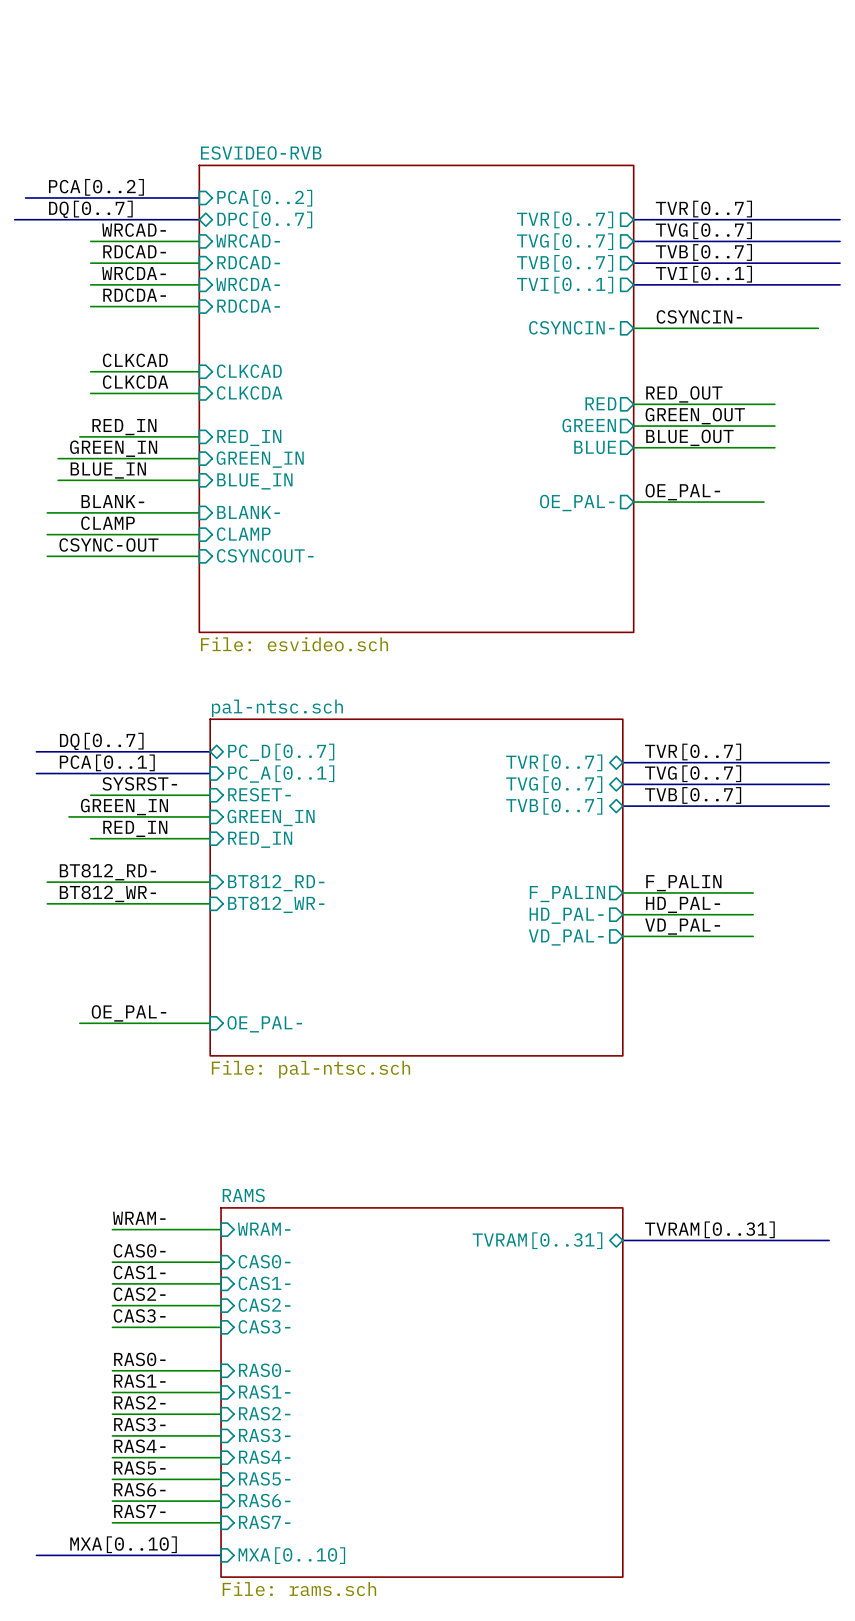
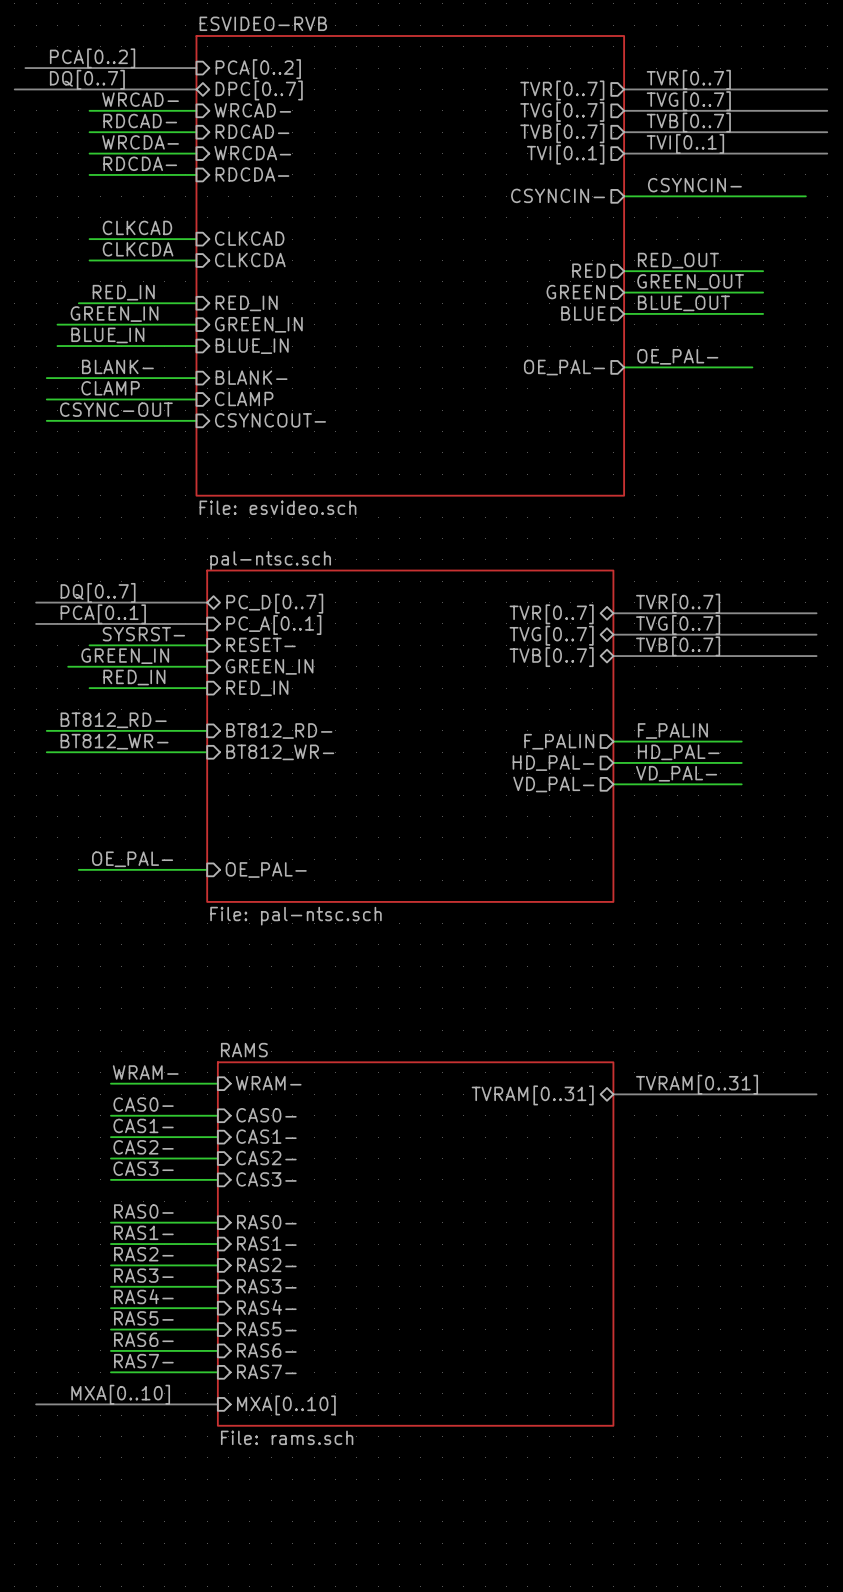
label: none -> WRCAD- (140, 99)
sheet pin: none -> WRCAD- (252, 110)
wire: none -> (89, 110) (196, 110)
label: none -> RDCAD- (140, 121)
wire: none -> (89, 132) (196, 132)
sheet pin: none -> RDCAD- (252, 131)
sheet pin: none -> RDCDA- (252, 174)
label position: PCA[0..2] (96, 187) -> PCA[0..2] (92, 58)
bus: (25, 197) (199, 197) -> (25, 68) (196, 68)
sheet pin position: PCA[0..2] (264, 198) -> PCA[0..2] (258, 69)
label position: DQ[0..7] (90, 209) -> DQ[0..7] (87, 79)
label position: TVR[0..7] (703, 209) -> TVR[0..7] (688, 79)
bus: (14, 219) (199, 219) -> (14, 89) (196, 89)
sheet pin position: DPC[0..7] (264, 219) -> DPC[0..7] (259, 90)
sheet pin position: TVR[0..7] (565, 219) -> TVR[0..7] (562, 90)
bus: (633, 219) (840, 219) -> (624, 89) (827, 89)
label: WRCAD- (134, 230) -> CLKCAD (137, 227)
label position: TVG[0..7] (703, 230) -> TVG[0..7] (688, 101)
sheet pin: WRCAD- (248, 240) -> CLKCAD (249, 238)
sheet pin position: TVG[0..7] (565, 241) -> TVG[0..7] (562, 111)
bus: (633, 241) (840, 241) -> (624, 110) (827, 110)
label: RDCAD- (134, 251) -> CLKCDA (138, 249)
label position: TVB[0..7] (703, 252) -> TVB[0..7] (688, 122)
sheet pin: RDCAD- (248, 262) -> CLKCDA (250, 260)
sheet pin position: TVB[0..7] (565, 263) -> TVB[0..7] (562, 133)
bus: (633, 263) (840, 263) -> (624, 132) (827, 132)
label position: WRCDA- (134, 273) -> WRCDA- (140, 142)
label position: TVI[0..1] (703, 274) -> TVI[0..1] (685, 143)
wire: (90, 284) (199, 284) -> (89, 153) (196, 153)
sheet pin position: WRCDA- (248, 284) -> WRCDA- (252, 153)
bus: (633, 284) (840, 284) -> (624, 153) (827, 153)
sheet pin position: TVI[0..1] (565, 285) -> TVI[0..1] (565, 154)
label position: RDCDA- (134, 295) -> RDCDA- (140, 163)
wire: none -> (78, 303) (89, 303)
sheet pin: RDCDA- (248, 306) -> RED_IN (246, 303)
label position: CSYNCIN- (699, 316) -> CSYNCIN- (694, 185)
label: none -> GREEN_IN (114, 314)
sheet pin position: CSYNCIN- (571, 327) -> CSYNCIN- (558, 195)
wire: (633, 328) (818, 328) -> (624, 196) (805, 196)
sheet pin: none -> GREEN_IN (258, 324)
label: CLKCAD (135, 360) -> none
wire: (90, 371) (199, 371) -> (89, 174) (196, 174)
sheet pin: CLKCAD (249, 371) -> none
label: CLKCDA (135, 382) -> none
sheet pin: CLKCDA (249, 392) -> none
wire: (90, 393) (199, 393) -> none
label position: RED_OUT (684, 394) -> RED_OUT (678, 260)
sheet ESVIDEO-RVB position: (416, 398) -> (410, 265)
sheet pin position: RED (600, 403) -> RED (588, 270)
wire: (633, 404) (774, 404) -> (624, 271) (763, 271)
label position: GREEN_OUT (695, 416) -> GREEN_OUT (690, 281)
sheet pin position: GREEN (589, 425) -> GREEN (575, 292)
wire: (633, 426) (774, 426) -> (624, 292) (763, 292)
label position: RED_IN (124, 427) -> RED_IN (123, 292)
wire: (79, 436) (199, 436) -> none
sheet pin: RED_IN (249, 437) -> none
label position: BLUE_OUT (689, 437) -> BLUE_OUT (683, 303)
sheet pin position: BLUE (595, 447) -> BLUE (583, 313)
wire: (633, 447) (774, 447) -> (624, 313) (763, 313)
label: GREEN_IN (113, 448) -> none
wire: (58, 458) (199, 458) -> (57, 324) (196, 324)
sheet pin: GREEN_IN (260, 459) -> none
label position: BLUE_IN (108, 470) -> BLUE_IN (107, 335)
wire: (58, 480) (199, 480) -> (57, 346) (196, 346)
sheet pin position: BLUE_IN (254, 481) -> BLUE_IN (252, 346)
label position: OE_PAL- (682, 492) -> OE_PAL- (677, 356)
label position: BLANK- (112, 501) -> BLANK- (117, 366)
wire: (633, 502) (763, 502) -> (624, 367) (752, 367)
sheet pin position: OE_PAL- (577, 503) -> OE_PAL- (564, 367)
wire: (47, 512) (199, 512) -> (46, 378) (196, 378)
sheet pin position: BLANK- (248, 512) -> BLANK- (251, 377)
label position: CLAMP (107, 523) -> CLAMP (110, 388)
wire: (47, 534) (199, 534) -> (46, 399) (196, 399)
sheet pin position: CLAMP (243, 534) -> CLAMP (244, 398)
label position: CSYNC-OUT (108, 544) -> CSYNC-OUT (116, 409)
sheet pin position: CSYNCOUT- (265, 555) -> CSYNCOUT- (270, 420)
wire: (47, 556) (199, 556) -> (46, 420) (196, 420)
label: none -> GREEN_IN (125, 656)
sheet pin: none -> GREEN_IN (269, 666)
label: none -> RED_IN (134, 677)
sheet pin: none -> RED_IN (257, 688)
wire: none -> (46, 730) (207, 730)
label position: DQ[0..7] (101, 741) -> DQ[0..7] (98, 592)
sheet pin: none -> BT812_RD- (279, 731)
bus: (36, 751) (210, 751) -> (36, 602) (207, 602)
sheet pin position: PC_D[0..7] (281, 752) -> PC_D[0..7] (274, 603)
label position: TVR[0..7] (693, 752) -> TVR[0..7] (678, 603)
label position: PCA[0..1] (107, 762) -> PCA[0..1] (103, 614)
sheet pin position: TVR[0..7] (554, 762) -> TVR[0..7] (551, 614)
bus: (622, 762) (829, 762) -> (613, 613) (816, 613)
bus: (36, 773) (210, 773) -> (36, 623) (207, 623)
label position: TVG[0..7] (693, 773) -> TVG[0..7] (678, 625)
sheet pin position: PC_A[0..1] (281, 774) -> PC_A[0..1] (273, 625)
label position: SYSRST- (139, 783) -> SYSRST- (143, 634)
sheet pin position: TVG[0..7] (554, 784) -> TVG[0..7] (551, 635)
bus: (622, 784) (829, 784) -> (613, 634) (816, 634)
sheet pin position: RESET- (259, 794) -> RESET- (261, 644)
wire: (90, 795) (210, 795) -> (89, 645) (207, 645)
label position: TVB[0..7] (693, 795) -> TVB[0..7] (678, 646)
sheet pin position: TVB[0..7] (554, 806) -> TVB[0..7] (551, 657)
bus: (622, 806) (829, 806) -> (613, 656) (816, 656)
label: GREEN_IN (124, 807) -> none
wire: (69, 816) (210, 816) -> (68, 666) (207, 666)
sheet pin: GREEN_IN (271, 817) -> none
label: RED_IN (135, 828) -> none
wire: (90, 838) (210, 838) -> (89, 688) (207, 688)
sheet pin: RED_IN (260, 839) -> none
label position: BT812_RD- (107, 872) -> BT812_RD- (113, 720)
wire: (47, 882) (79, 882) -> none
sheet pin: BT812_RD- (276, 883) -> OE_PAL- (266, 869)
label position: F_PALIN (683, 883) -> F_PALIN (672, 730)
sheet pal-ntsc.sch position: (416, 887) -> (410, 736)
wire: (622, 892) (753, 892) -> (613, 741) (741, 741)
label position: BT812_WR- (107, 893) -> BT812_WR- (114, 741)
sheet pin position: F_PALIN (567, 894) -> F_PALIN (559, 741)
wire: (47, 903) (210, 903) -> (46, 752) (207, 752)
sheet pin position: BT812_WR- (276, 904) -> BT812_WR- (280, 752)
label position: HD_PAL- (683, 904) -> HD_PAL- (678, 752)
wire: (622, 914) (753, 914) -> (613, 762) (741, 762)
sheet pin position: HD_PAL- (566, 915) -> HD_PAL- (553, 763)
label position: VD_PAL- (682, 926) -> VD_PAL- (676, 773)
wire: (622, 936) (753, 936) -> (613, 784) (741, 784)
sheet pin position: VD_PAL- (566, 937) -> VD_PAL- (553, 784)
label position: OE_PAL- (129, 1013) -> OE_PAL- (132, 859)
wire: (79, 1023) (210, 1023) -> none
sheet pin: OE_PAL- (264, 1024) -> none
label: none -> CAS0- (143, 1104)
wire: none -> (110, 1115) (217, 1115)
sheet pin: none -> CAS0- (266, 1115)
label: none -> CAS1- (143, 1125)
wire: none -> (110, 1137) (217, 1137)
sheet pin: none -> CAS1- (266, 1136)
label: none -> CAS2- (143, 1147)
sheet pin: none -> CAS2- (266, 1158)
wire: none -> (110, 1158) (217, 1158)
label: none -> CAS3- (143, 1168)
sheet pin: none -> CAS3- (266, 1179)
wire: none -> (110, 1179) (217, 1179)
label position: WRAM- (139, 1218) -> WRAM- (145, 1072)
wire: (112, 1229) (221, 1229) -> (110, 1083) (217, 1083)
label: none -> RAS0- (143, 1211)
sheet pin position: WRAM- (264, 1229) -> WRAM- (268, 1083)
label position: TVRAM[0..31] (709, 1229) -> TVRAM[0..31] (697, 1084)
sheet pin: none -> RAS0- (266, 1222)
sheet pin position: TVRAM[0..31] (537, 1240) -> TVRAM[0..31] (532, 1095)
bus: (622, 1240) (829, 1240) -> (613, 1094) (816, 1094)
label: CAS0- (139, 1250) -> RAS1- (143, 1232)
sheet pin: CAS0- (264, 1261) -> RAS1- (266, 1243)
label: CAS1- (139, 1272) -> RAS2- (143, 1254)
sheet pin: CAS1- (264, 1283) -> RAS2- (266, 1264)
label: CAS2- (139, 1294) -> RAS3- (143, 1275)
sheet pin: CAS2- (264, 1305) -> RAS3- (266, 1286)
label: CAS3- (139, 1315) -> RAS4- (143, 1296)
sheet pin: CAS3- (264, 1326) -> RAS4- (266, 1307)
label: RAS0- (139, 1359) -> RAS6- (143, 1339)
sheet pin: RAS0- (264, 1370) -> RAS6- (266, 1350)
label: RAS1- (139, 1381) -> RAS7- (143, 1361)
sheet pin: RAS1- (264, 1392) -> RAS7- (266, 1371)
sheet RAMS position: (421, 1392) -> (415, 1244)
label: RAS2- (139, 1402) -> none
sheet pin: RAS2- (264, 1413) -> none
wire: (112, 1414) (221, 1414) -> (110, 1222) (217, 1222)
label: RAS3- (139, 1424) -> none
wire: (112, 1435) (221, 1435) -> none
sheet pin: RAS3- (264, 1435) -> none
label: RAS4- (139, 1446) -> none
wire: (112, 1457) (221, 1457) -> none
sheet pin: RAS4- (264, 1457) -> none
label position: RAS5- (139, 1468) -> RAS5- (143, 1318)
sheet pin position: RAS5- (264, 1478) -> RAS5- (266, 1329)
wire: (112, 1479) (221, 1479) -> (110, 1329) (217, 1329)
label: RAS6- (139, 1489) -> none
sheet pin: RAS6- (264, 1500) -> none
wire: (112, 1501) (221, 1501) -> none
label: RAS7- (139, 1511) -> none
wire: (112, 1522) (221, 1522) -> none
sheet pin: RAS7- (264, 1522) -> none
label position: MXA[0..10] (123, 1544) -> MXA[0..10] (120, 1394)
bus: (36, 1555) (221, 1555) -> (36, 1404) (217, 1404)
sheet pin position: MXA[0..10] (291, 1555) -> MXA[0..10] (286, 1405)

